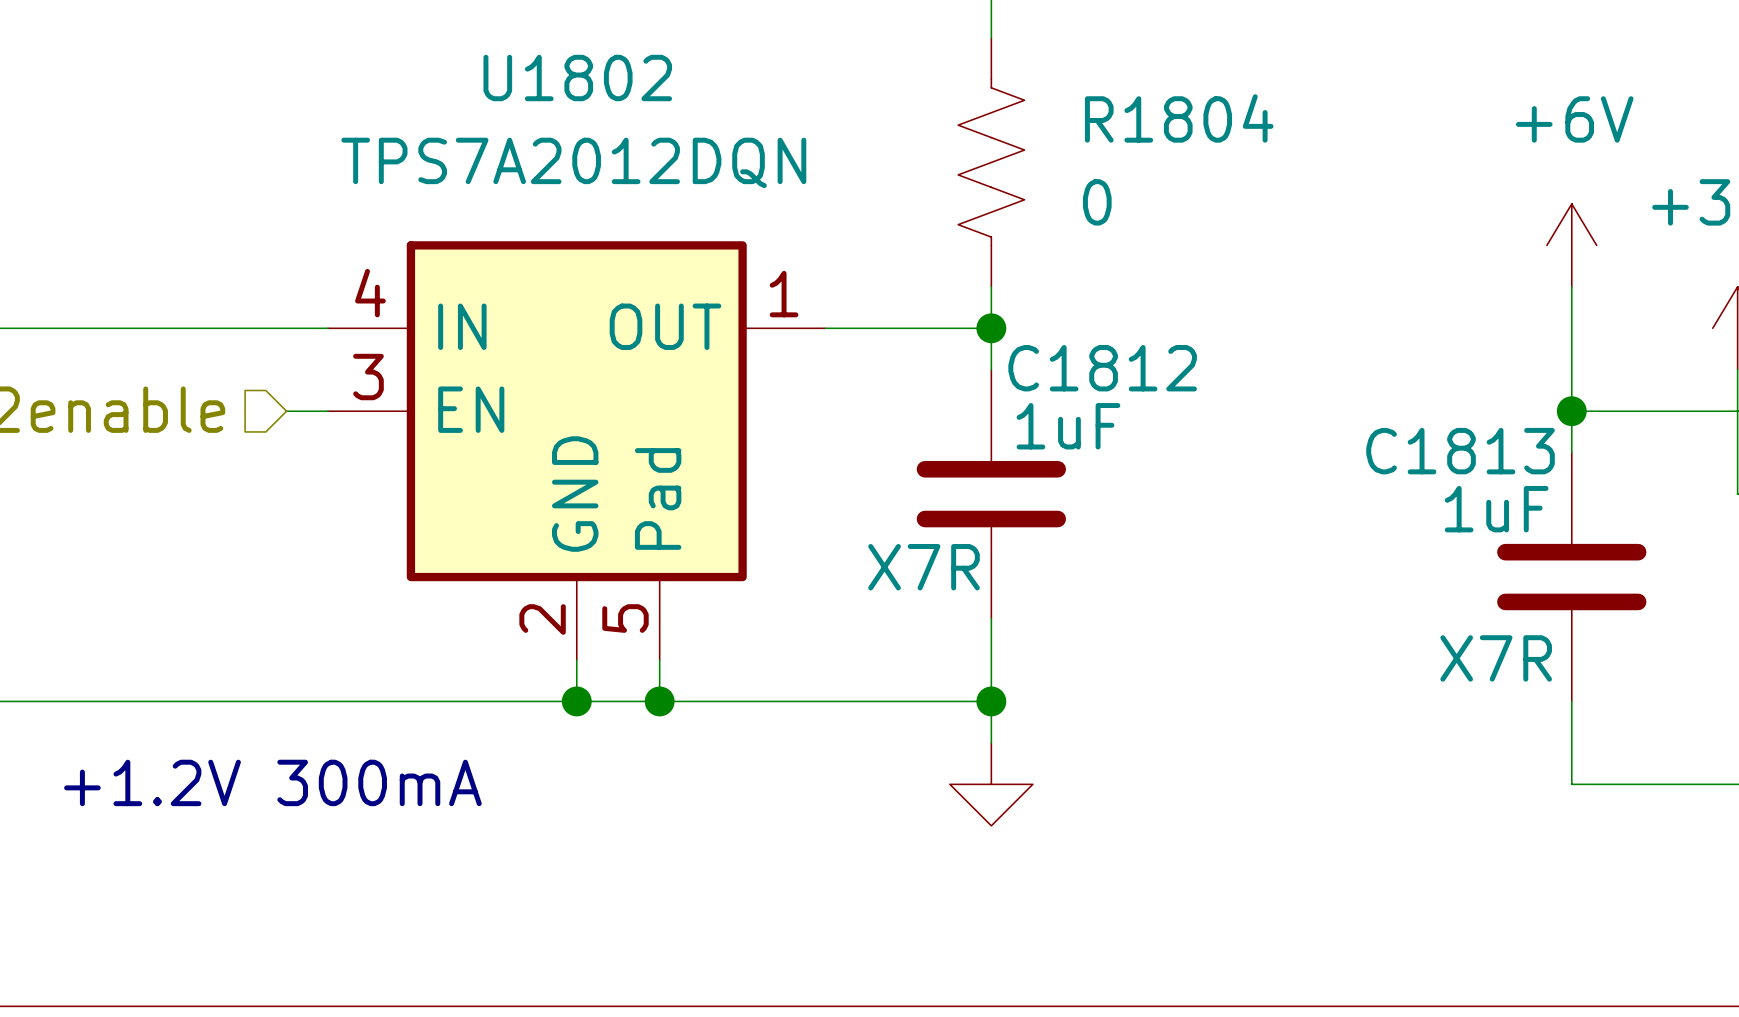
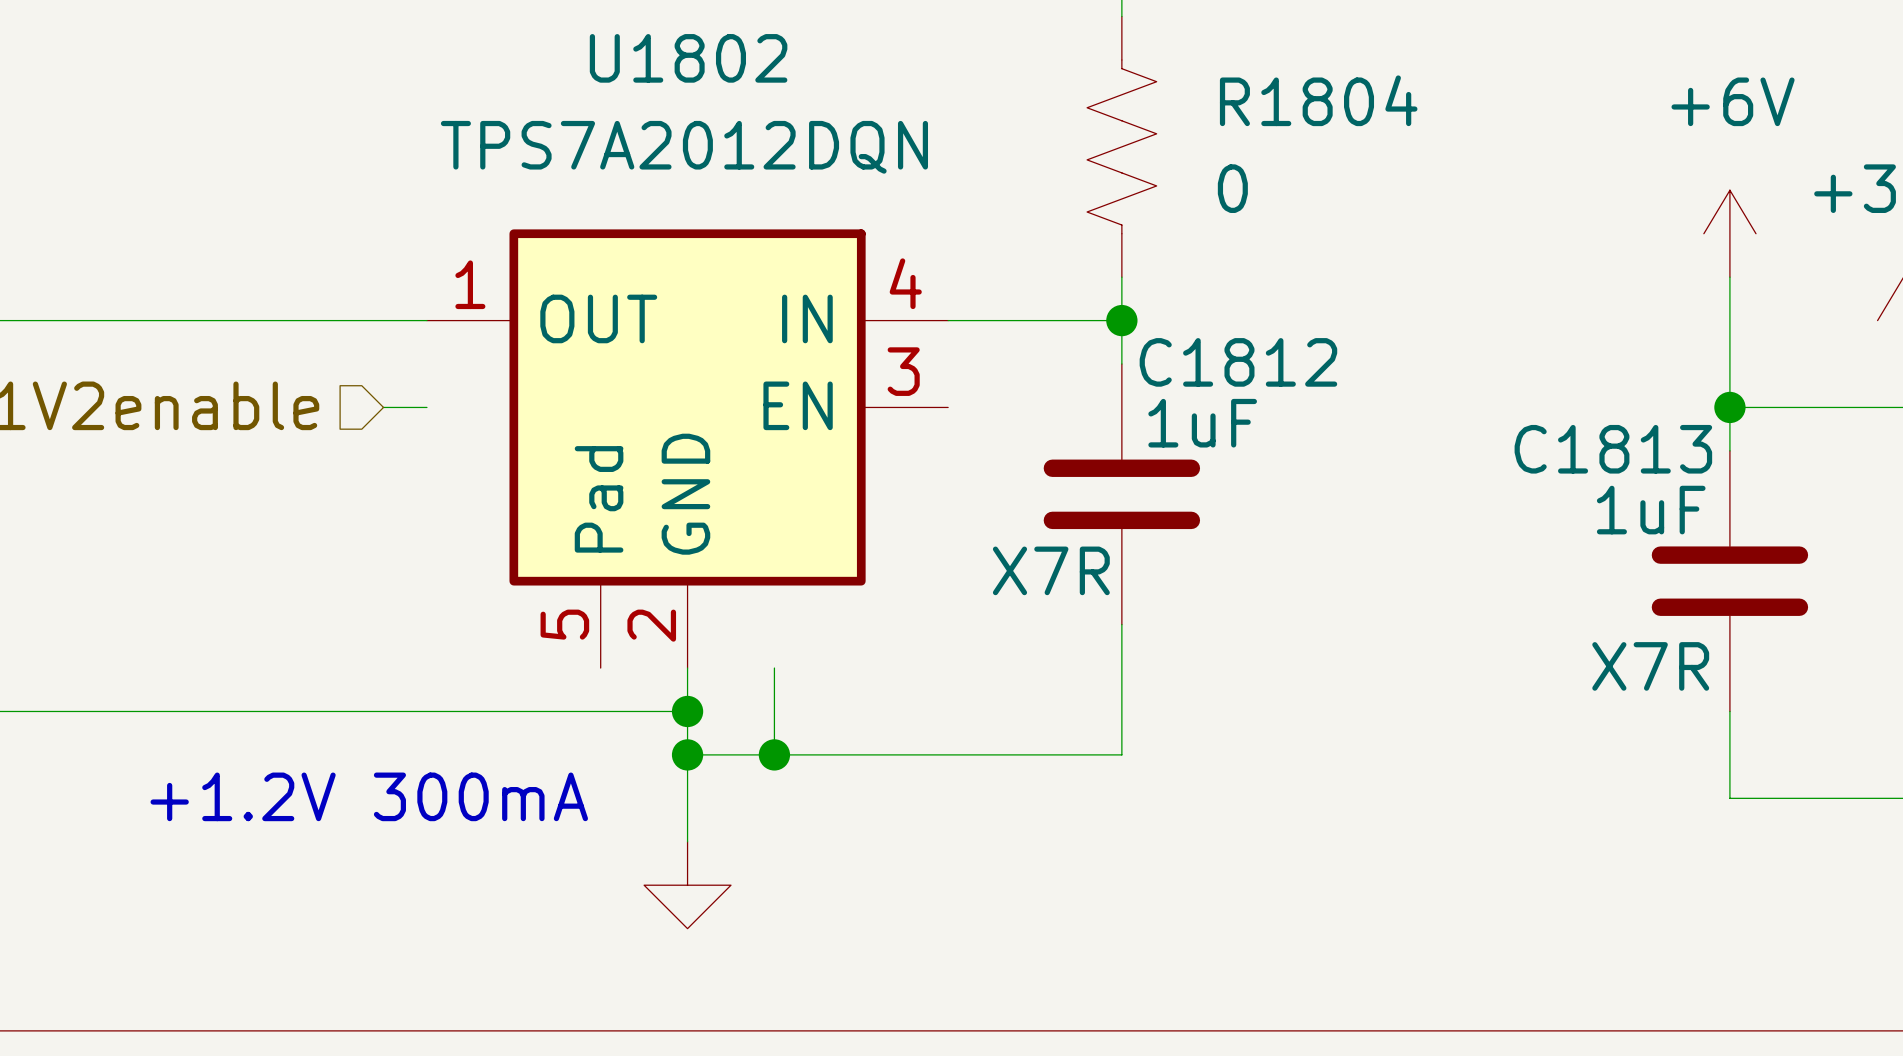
U1802 flip: as is (576, 411) -> left-right (687, 407)
wire: (576, 701) (991, 701) -> (687, 711) (687, 841)
wire: none -> (774, 711) (774, 754)
junction position: (659, 701) -> (774, 754)
junction: (991, 701) -> none
wire: none -> (687, 754) (1121, 754)
junction: none -> (687, 754)
power symbol position: (991, 784) -> (687, 885)

